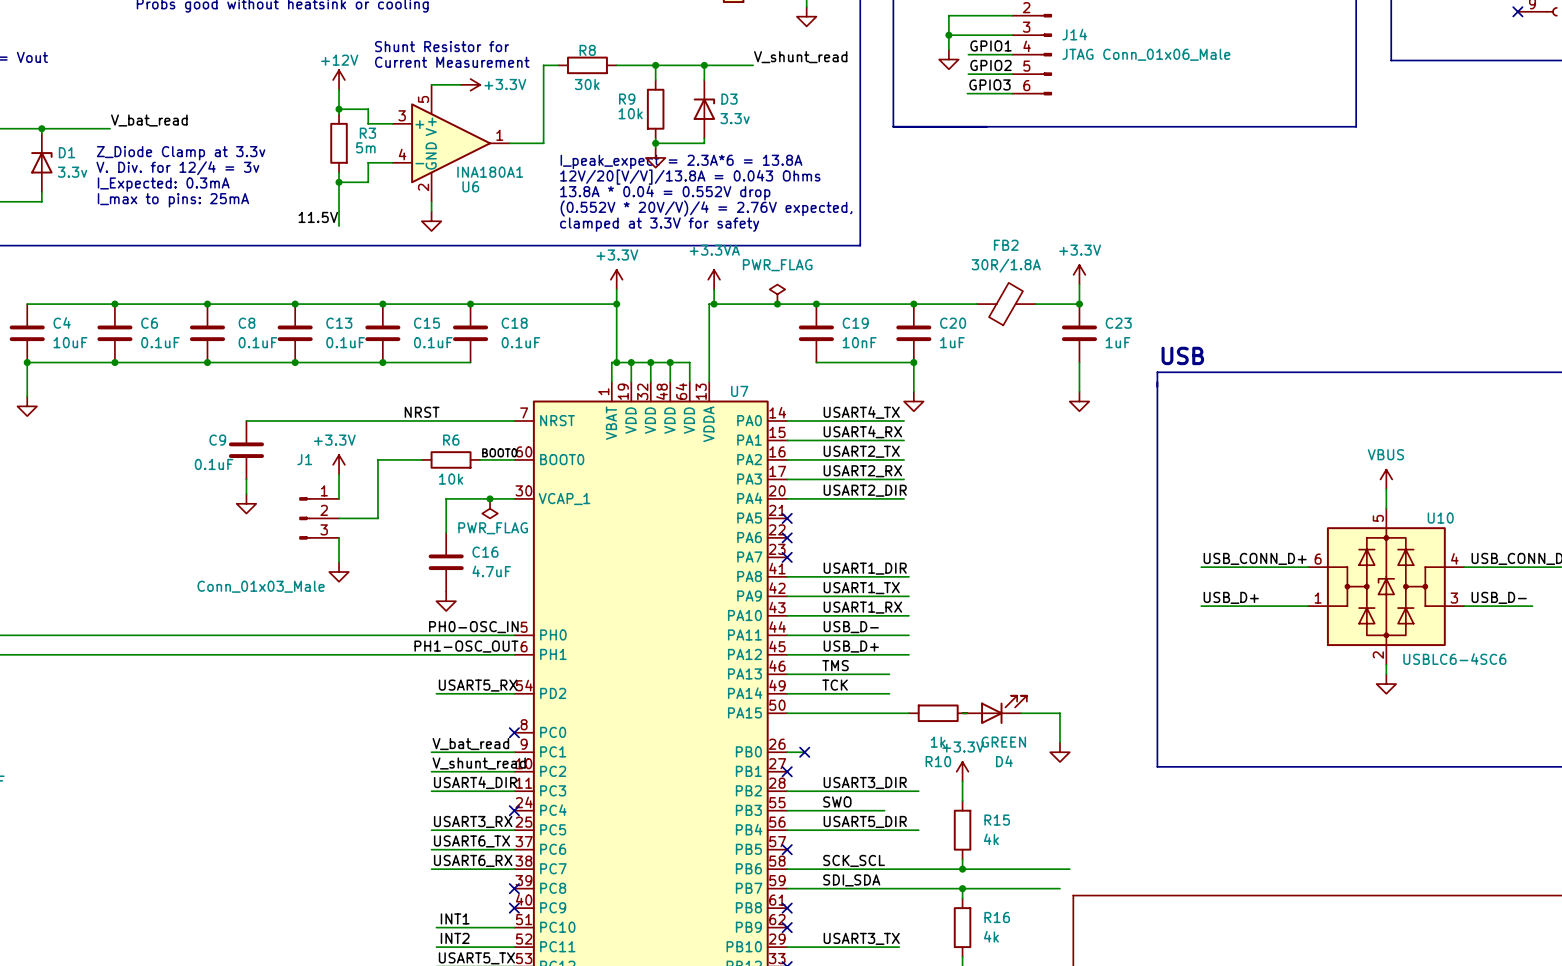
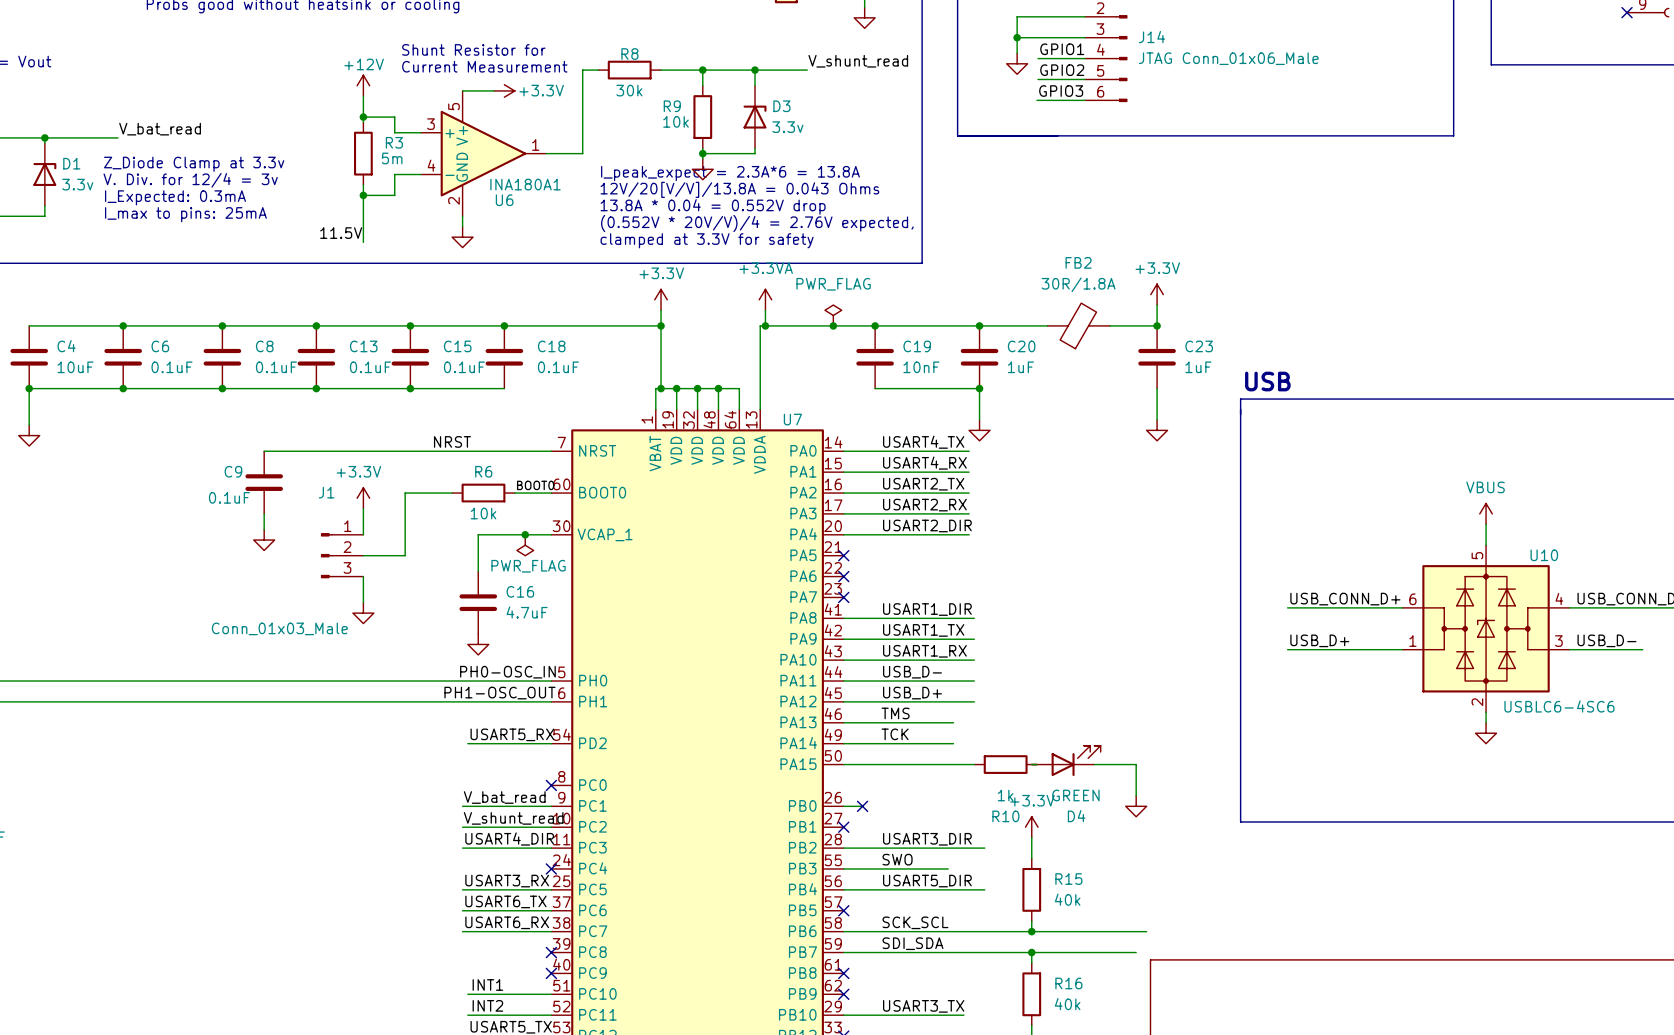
R15 value: 4k (991, 839) -> 40k (1067, 899)
R16 value: 4k (991, 936) -> 40k (1067, 1004)

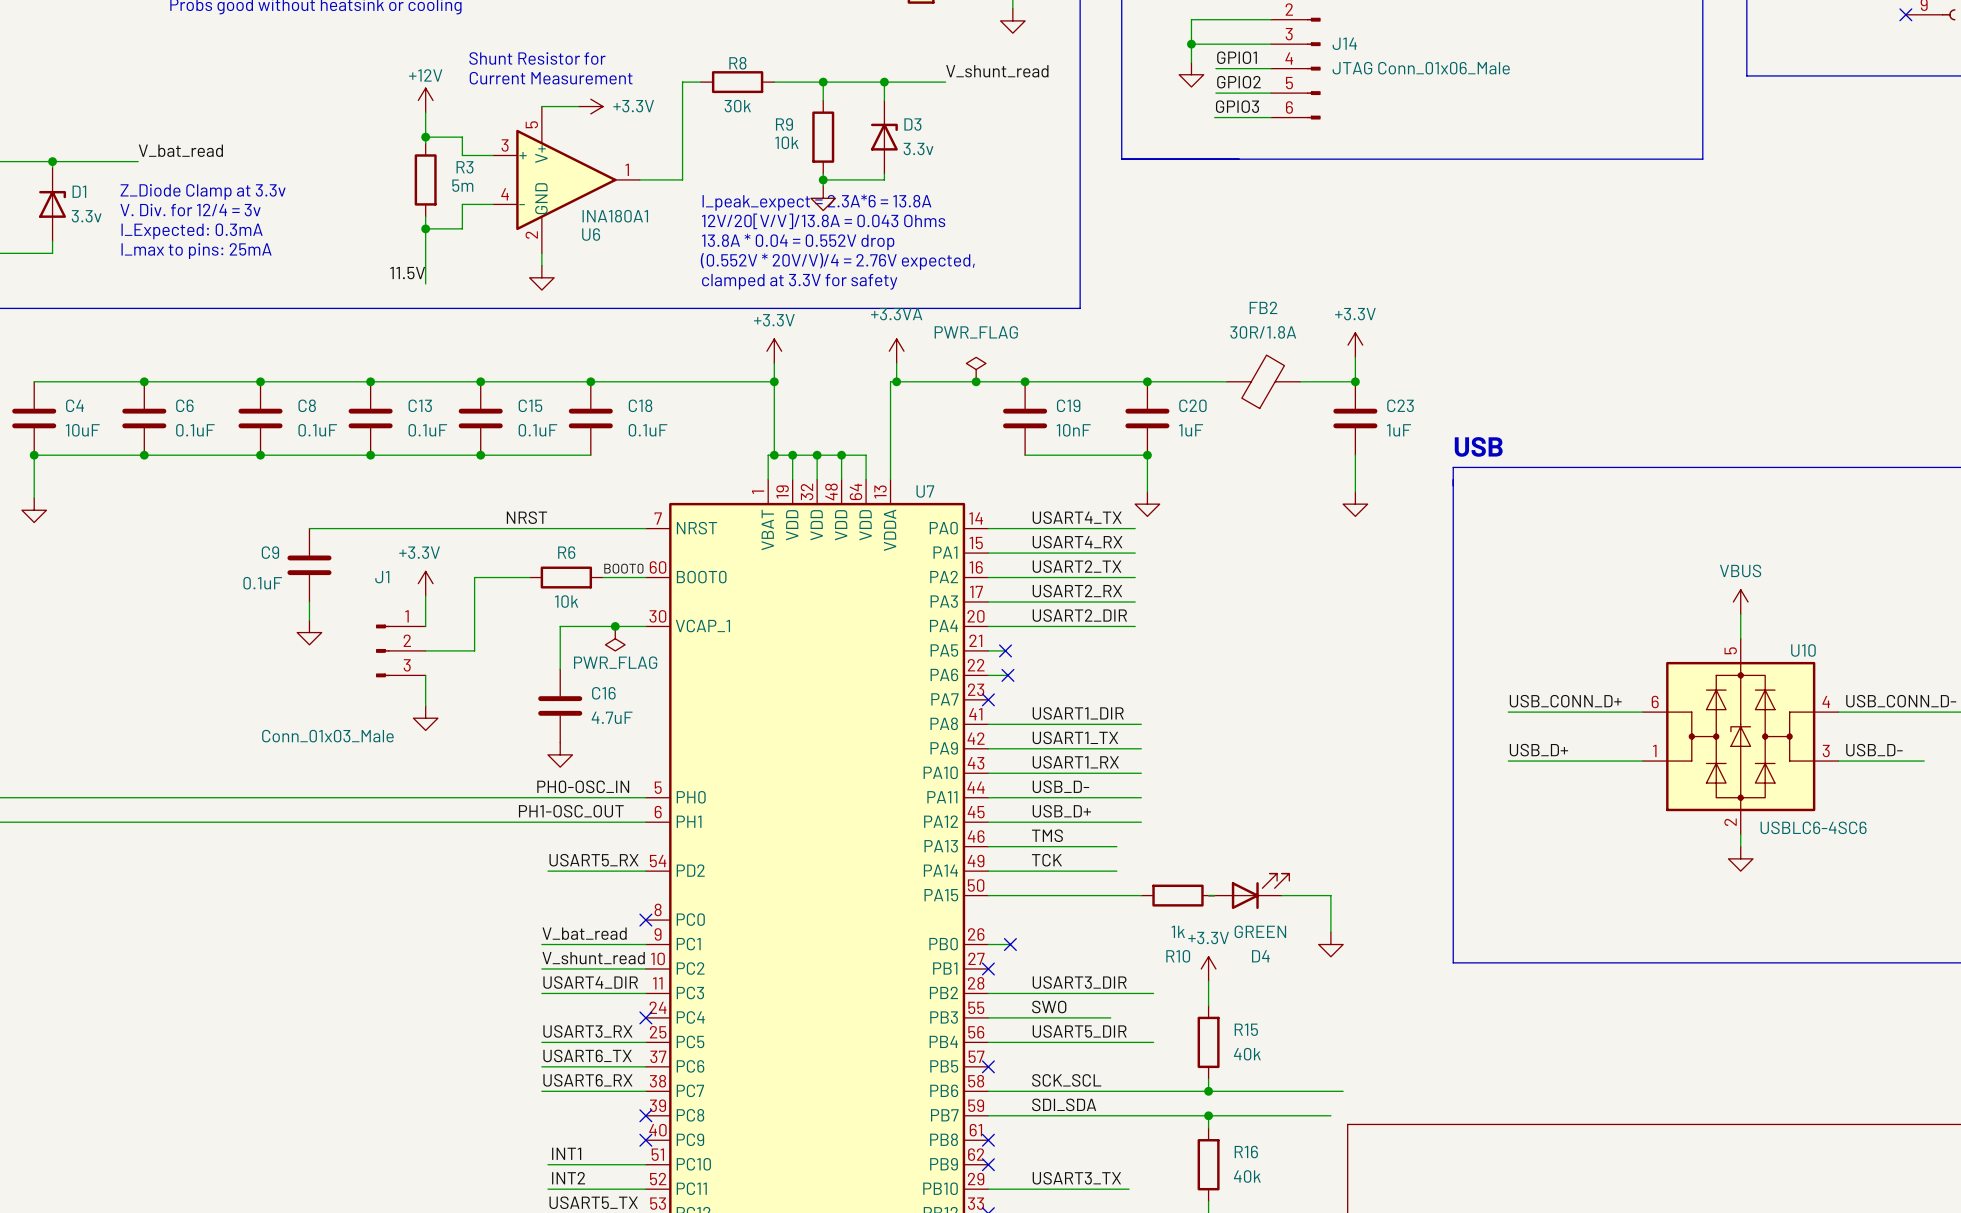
wire: none -> (988, 650) (1005, 650)
no-connect mark: (843, 555) -> none
no-connect mark: none -> (1005, 650)
wire: none -> (988, 675) (1007, 675)
no-connect mark: (843, 576) -> none
no-connect mark: none -> (1007, 675)

